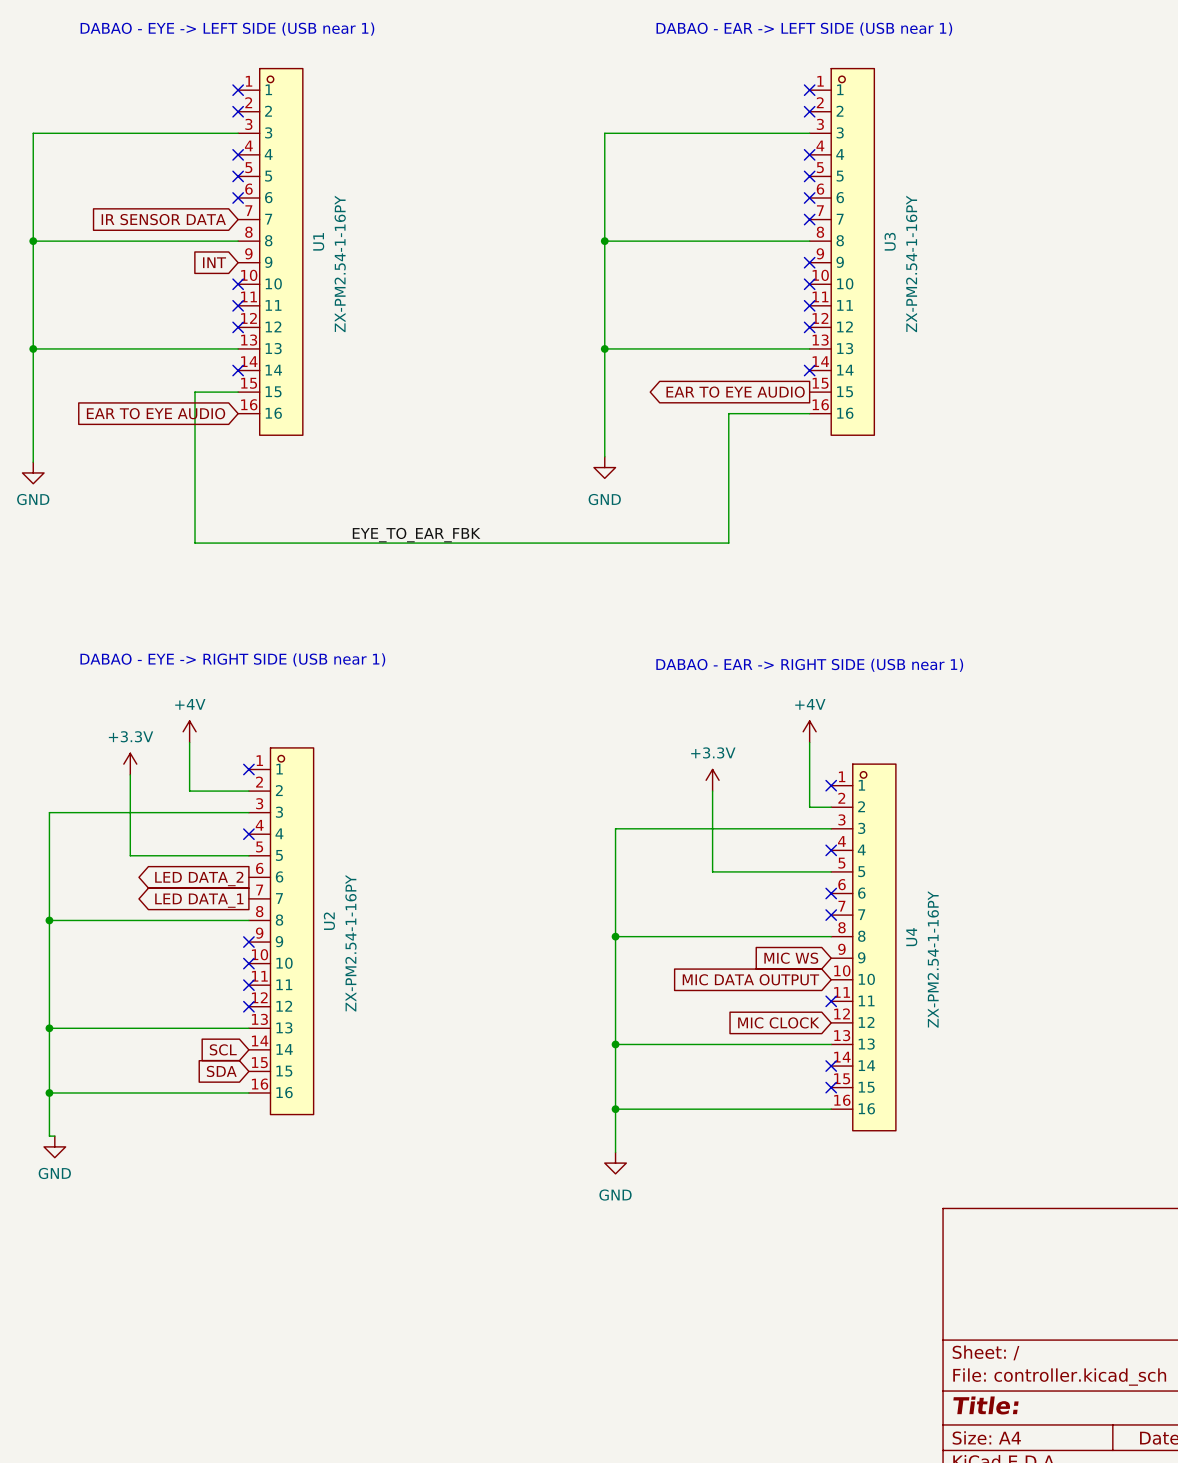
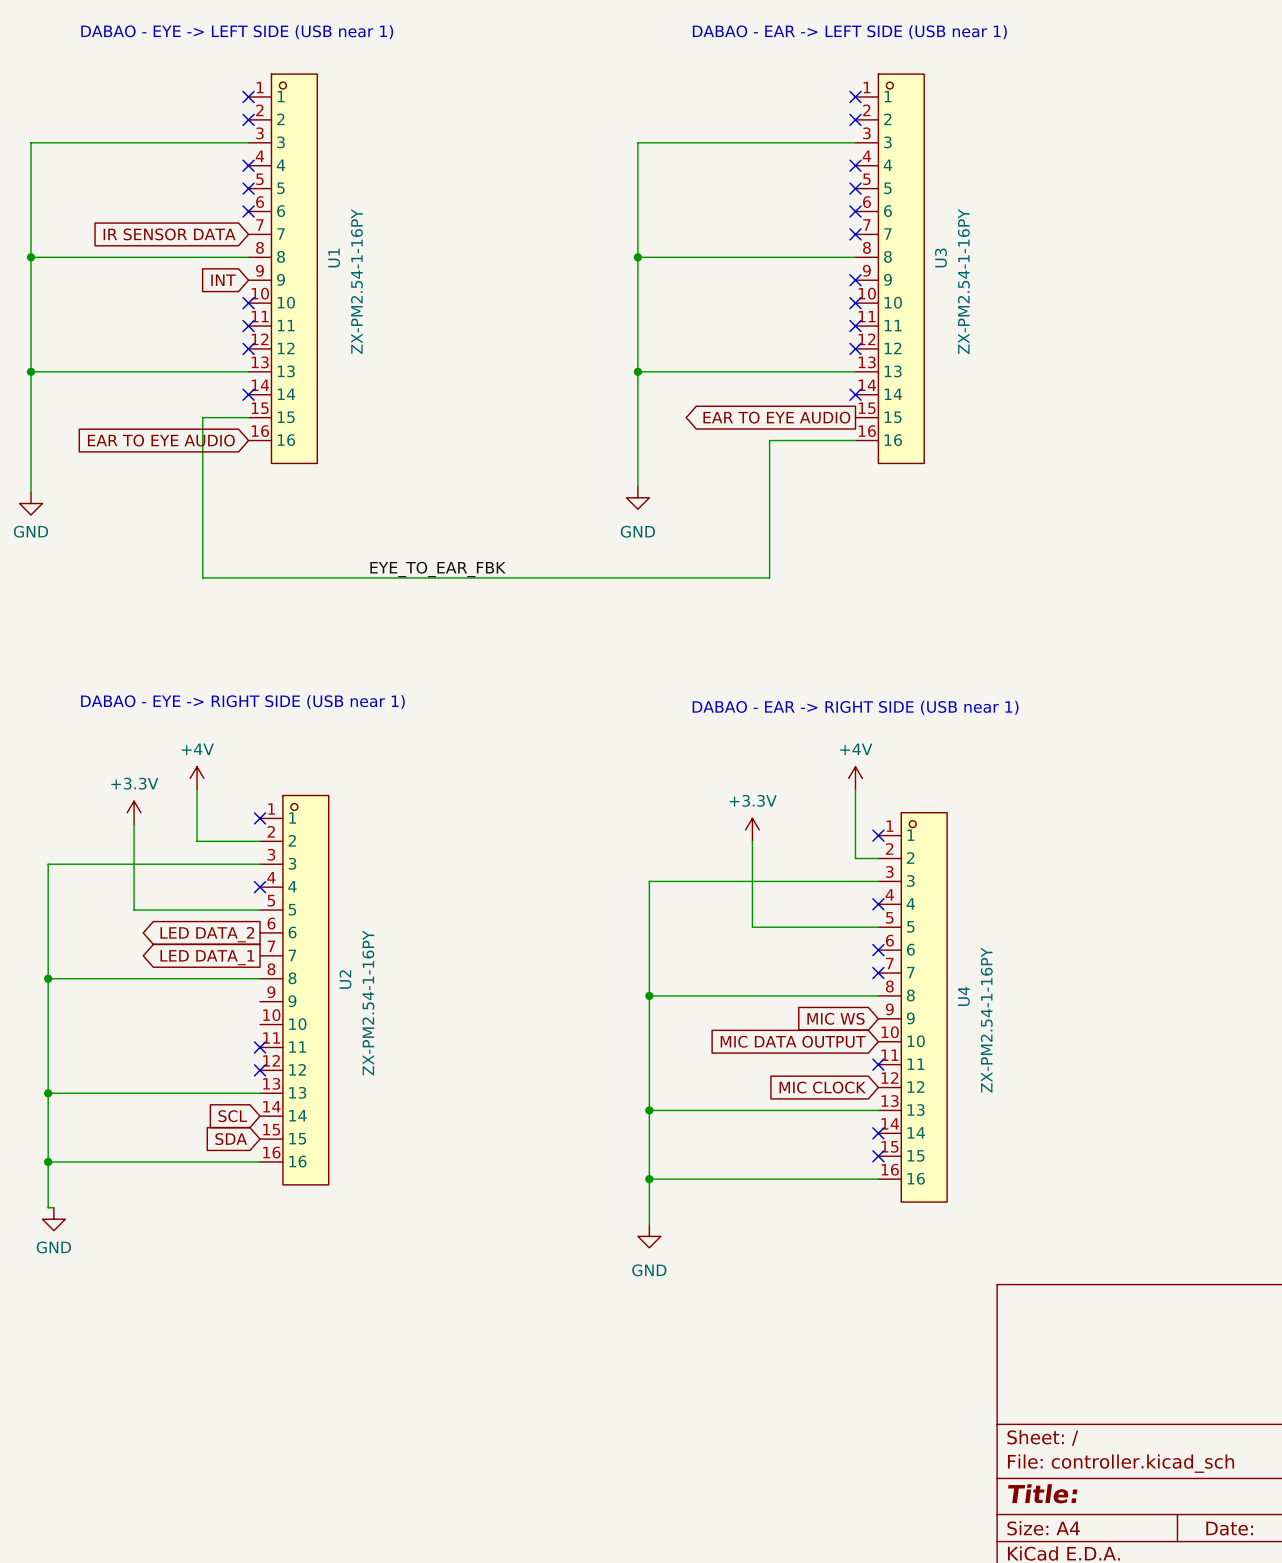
no-connect mark: (248, 942) -> none
no-connect mark: (248, 963) -> none

